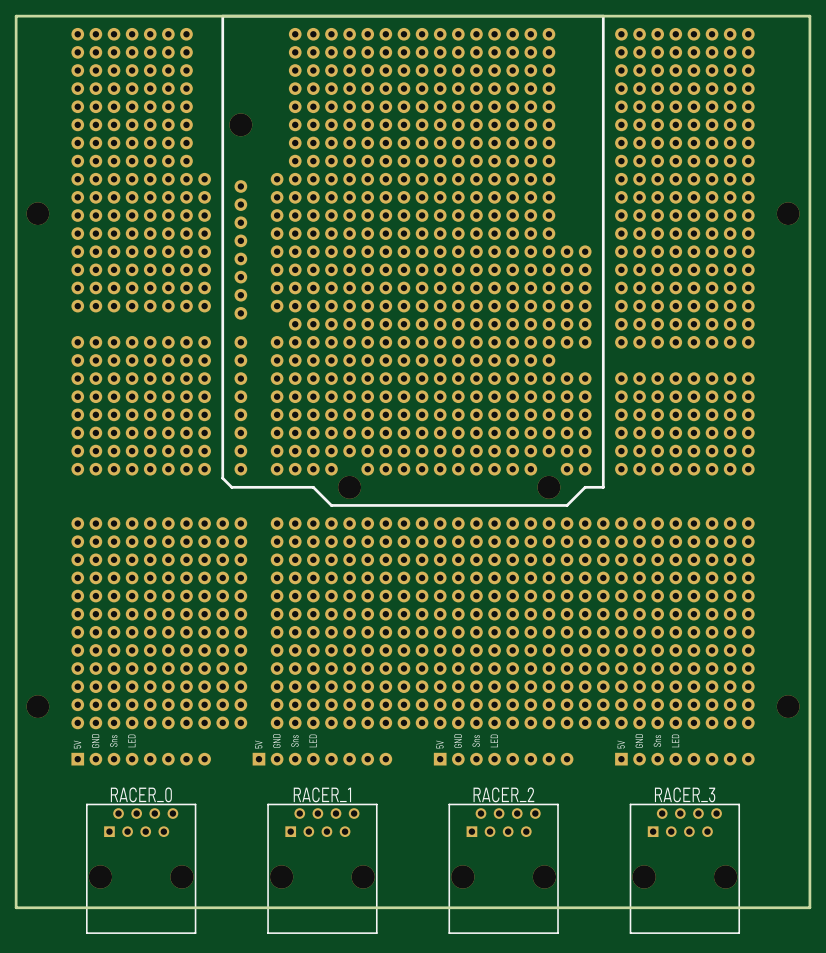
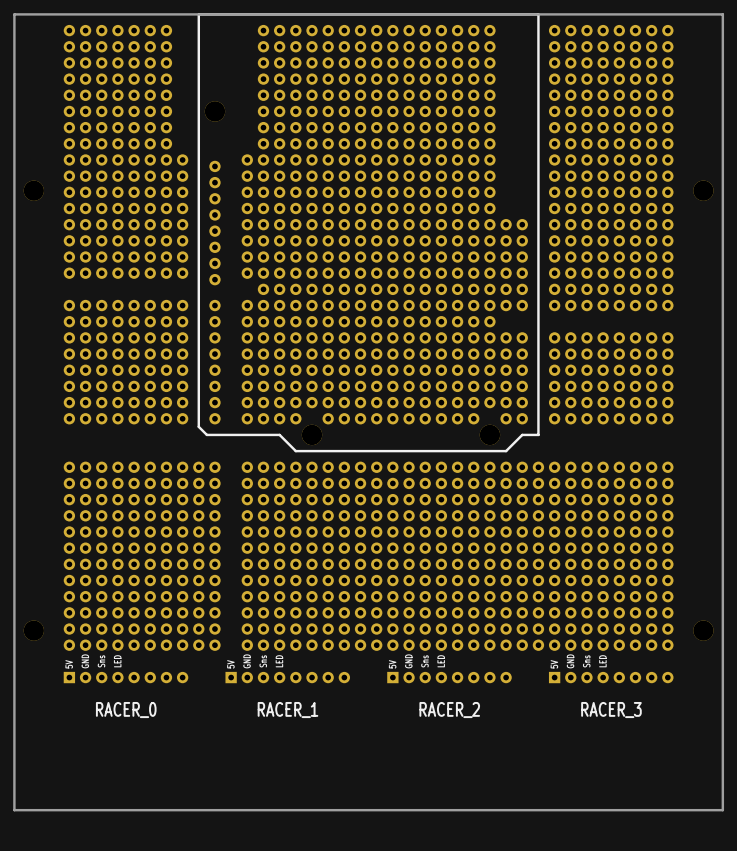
part: (141, 868) -> none
part: (322, 868) -> none
part: (503, 868) -> none
part: (684, 868) -> none

